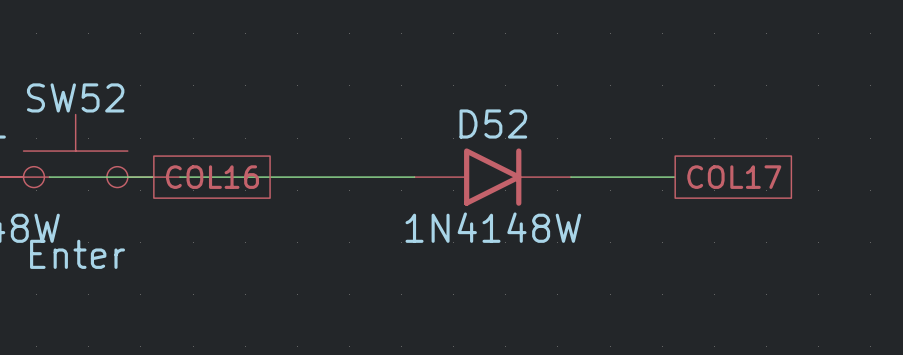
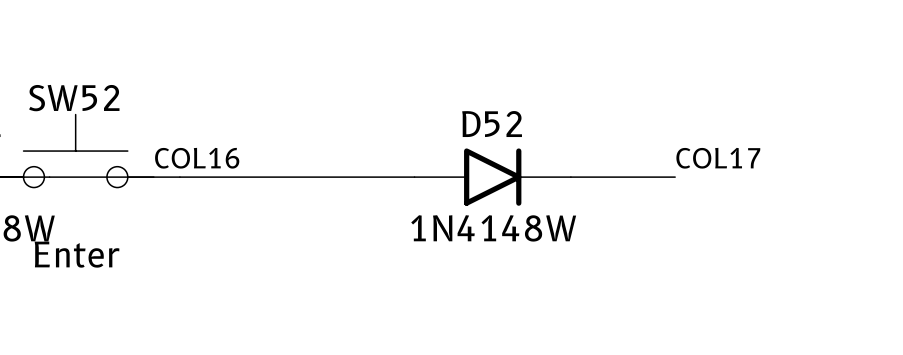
label: none -> COL16 (197, 158)
label: none -> COL17 (718, 158)
global label: COL16 (212, 177) -> none
global label: COL17 (734, 177) -> none

